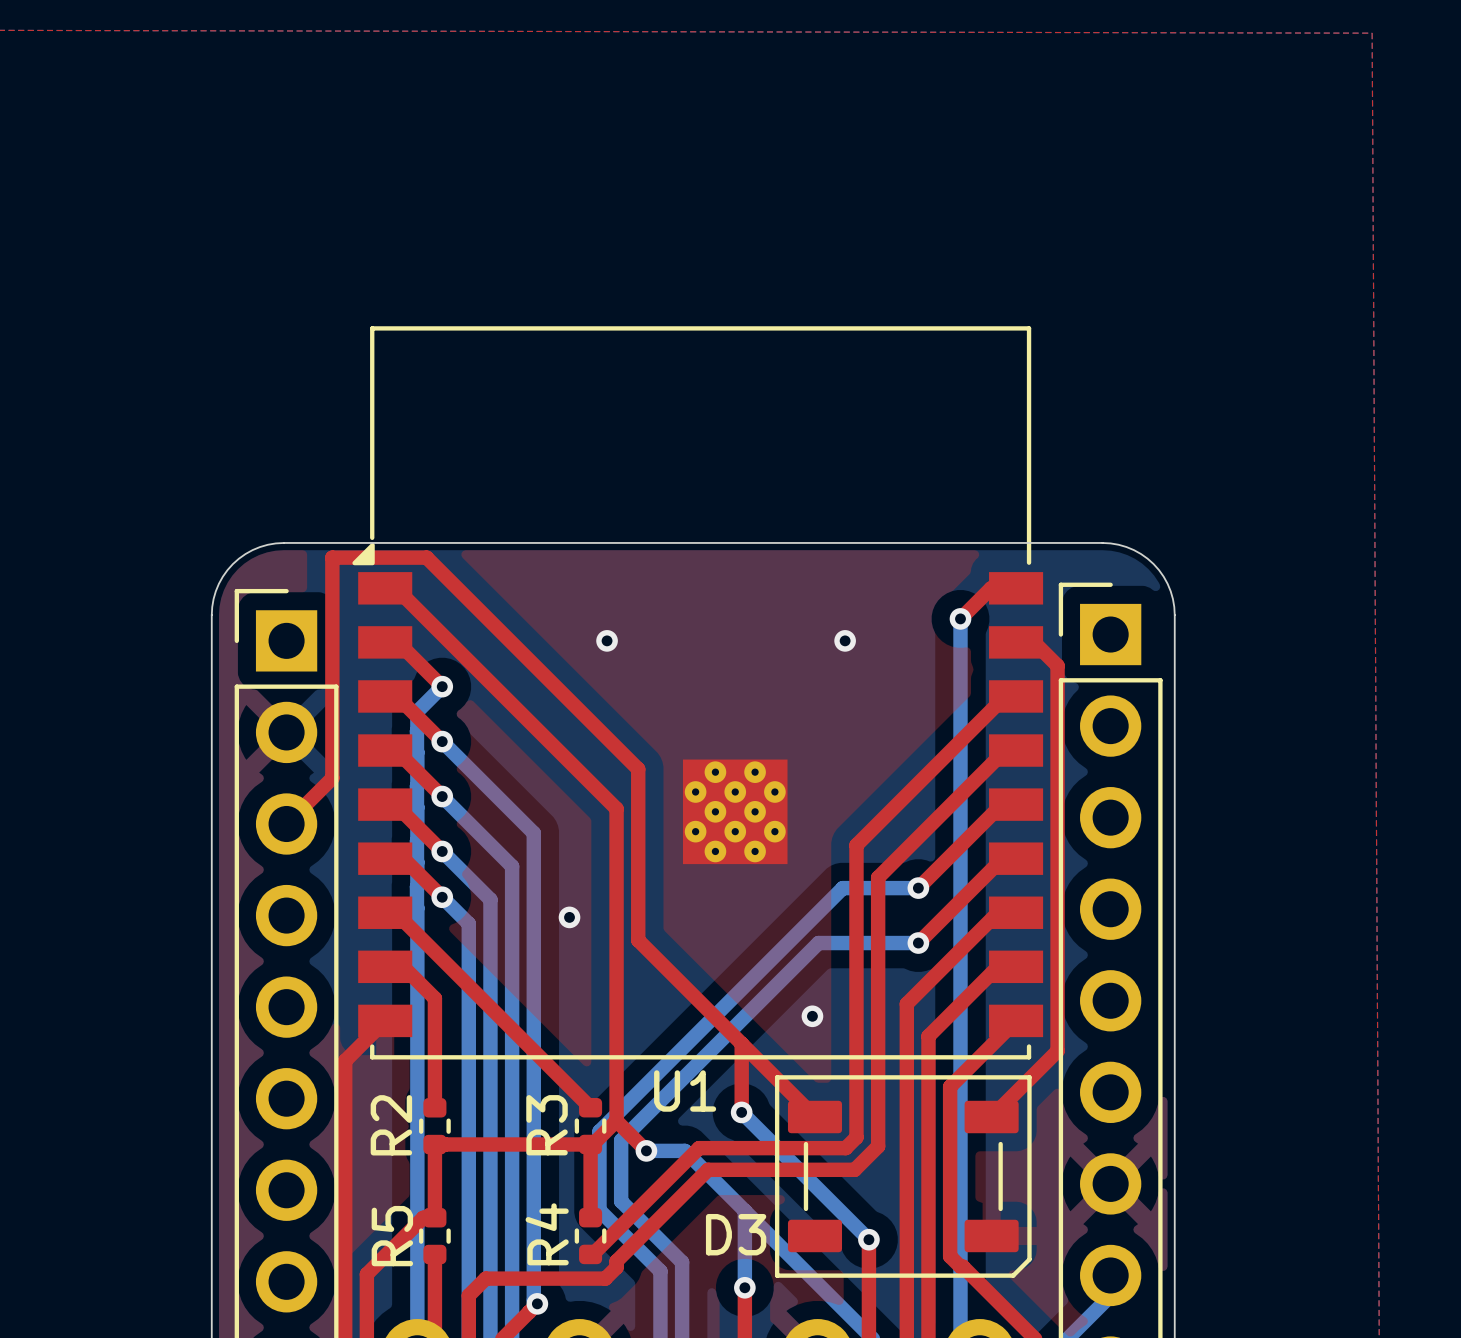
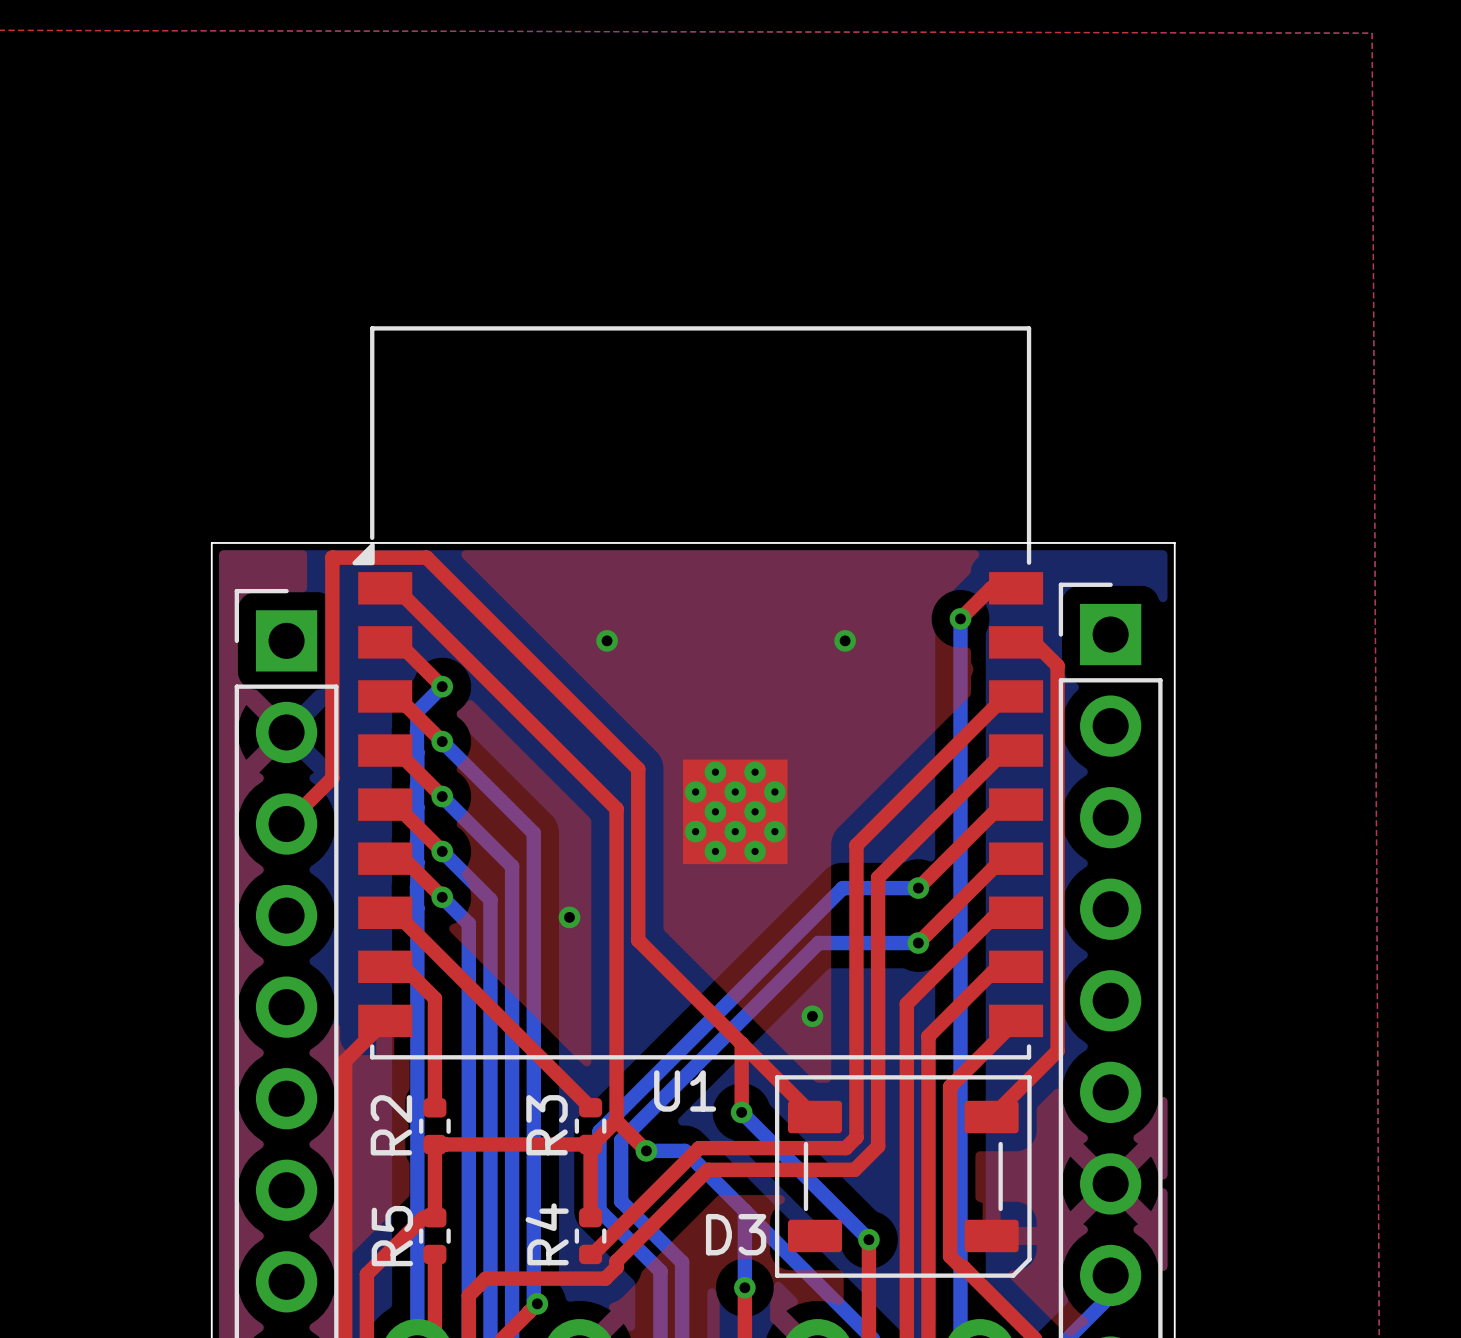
board edge: (283, 542) (260, 547) (245, 554) (232, 564) (222, 576) (215, 591) (211, 615) -> (283, 542) (211, 542) (211, 615)
board edge: (1102, 542) (1126, 547) (1141, 554) (1153, 564) (1163, 576) (1170, 591) (1174, 615) -> (1102, 542) (1174, 542) (1174, 615)

